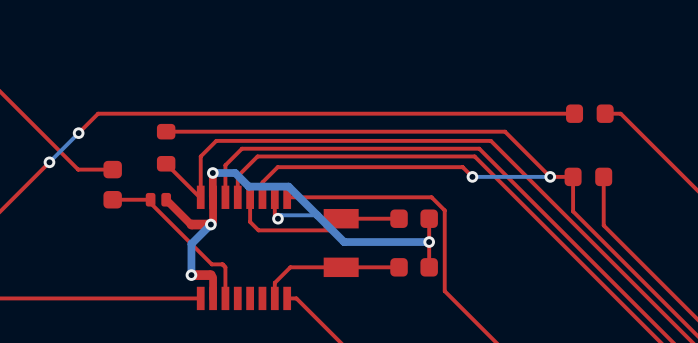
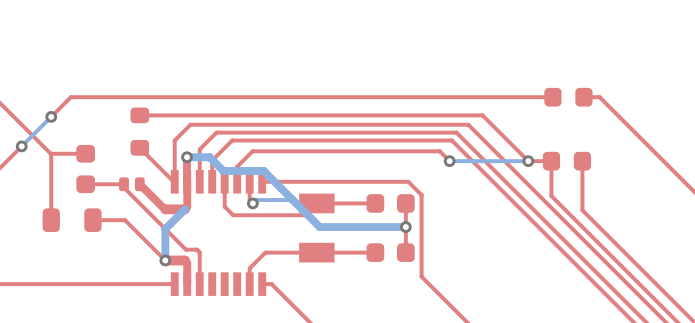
top track: none -> (50, 153) (51, 220)
via: (210, 224) -> none
part: none -> (72, 220)
top track: none -> (92, 220) (125, 220) (165, 260)

